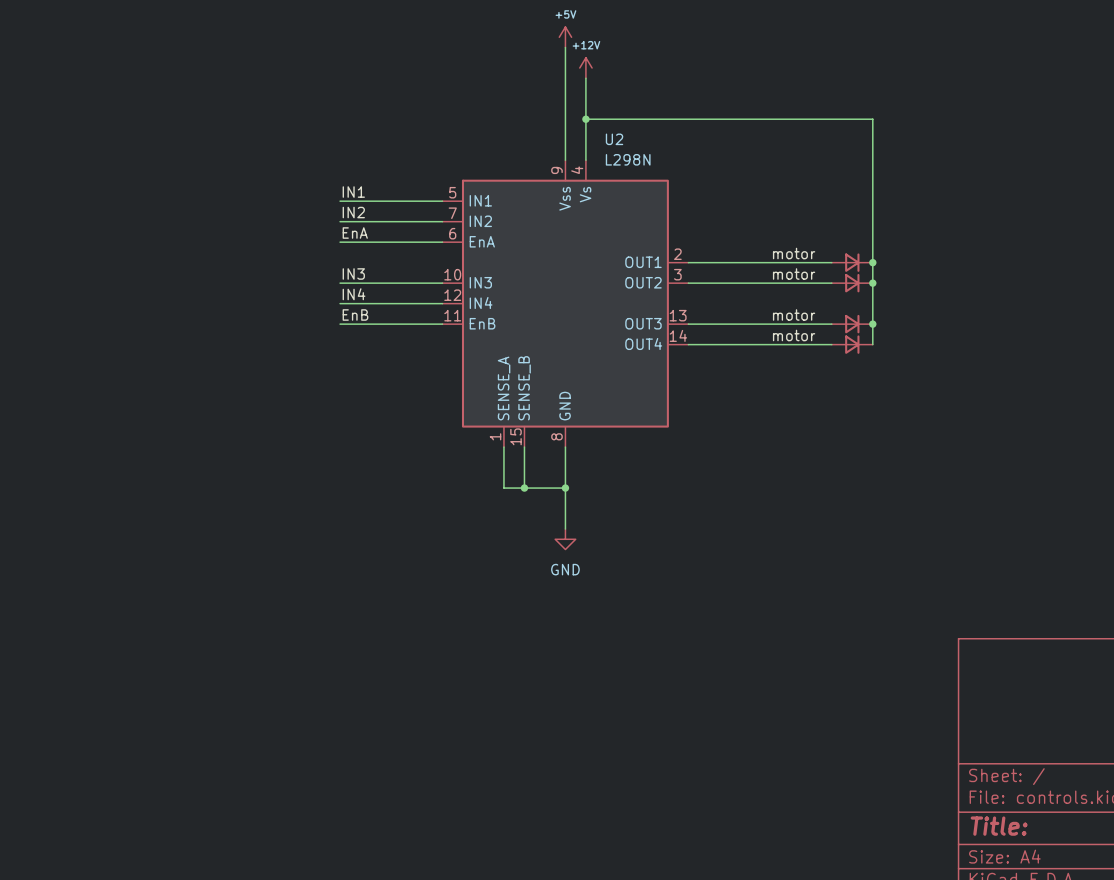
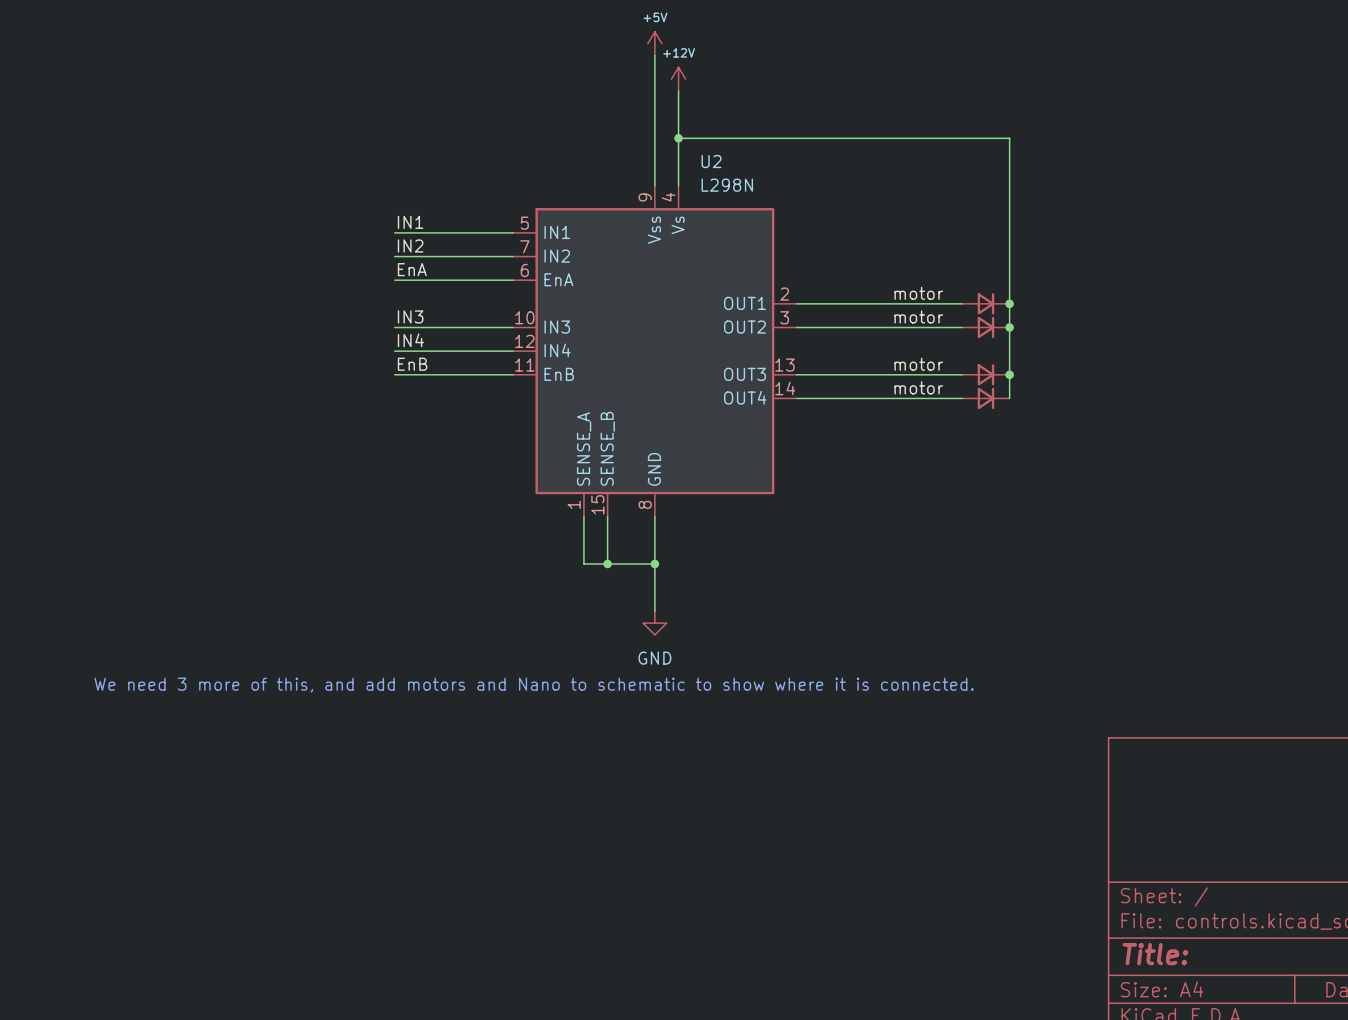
text: none -> We need 3 more of this, and add motors and Nano to schematic to show where it is connected. (534, 685)

